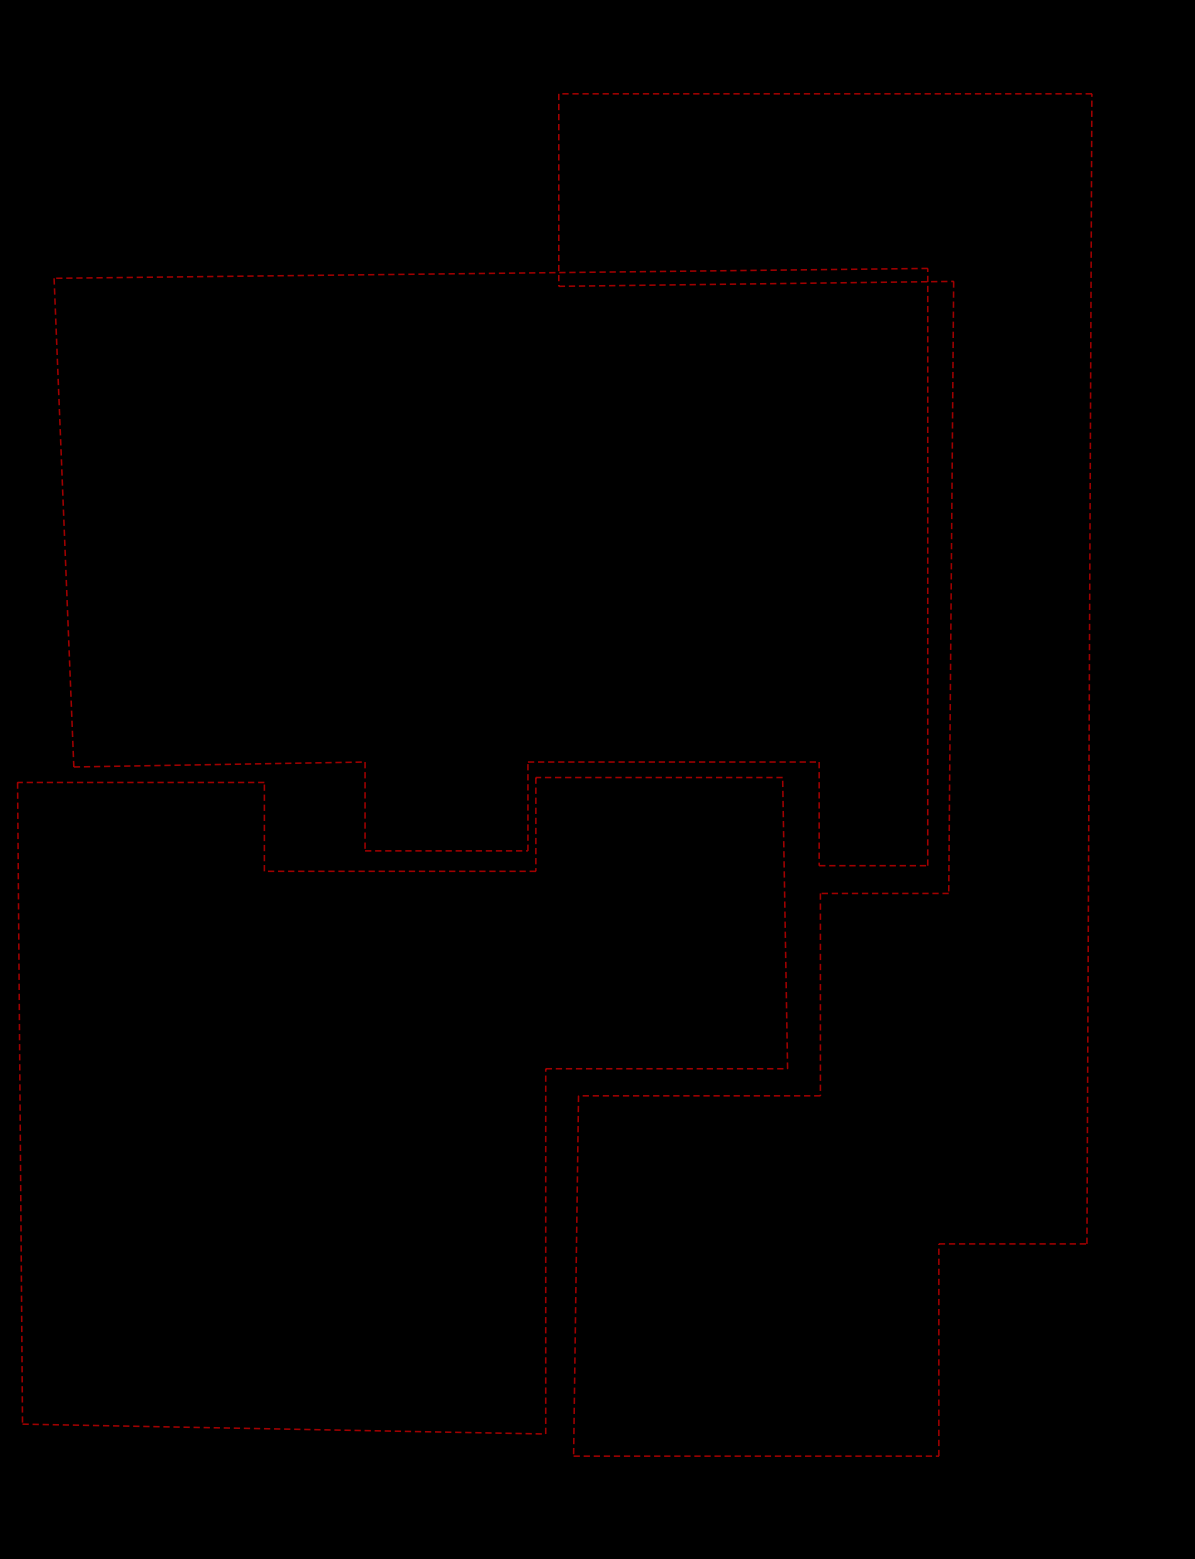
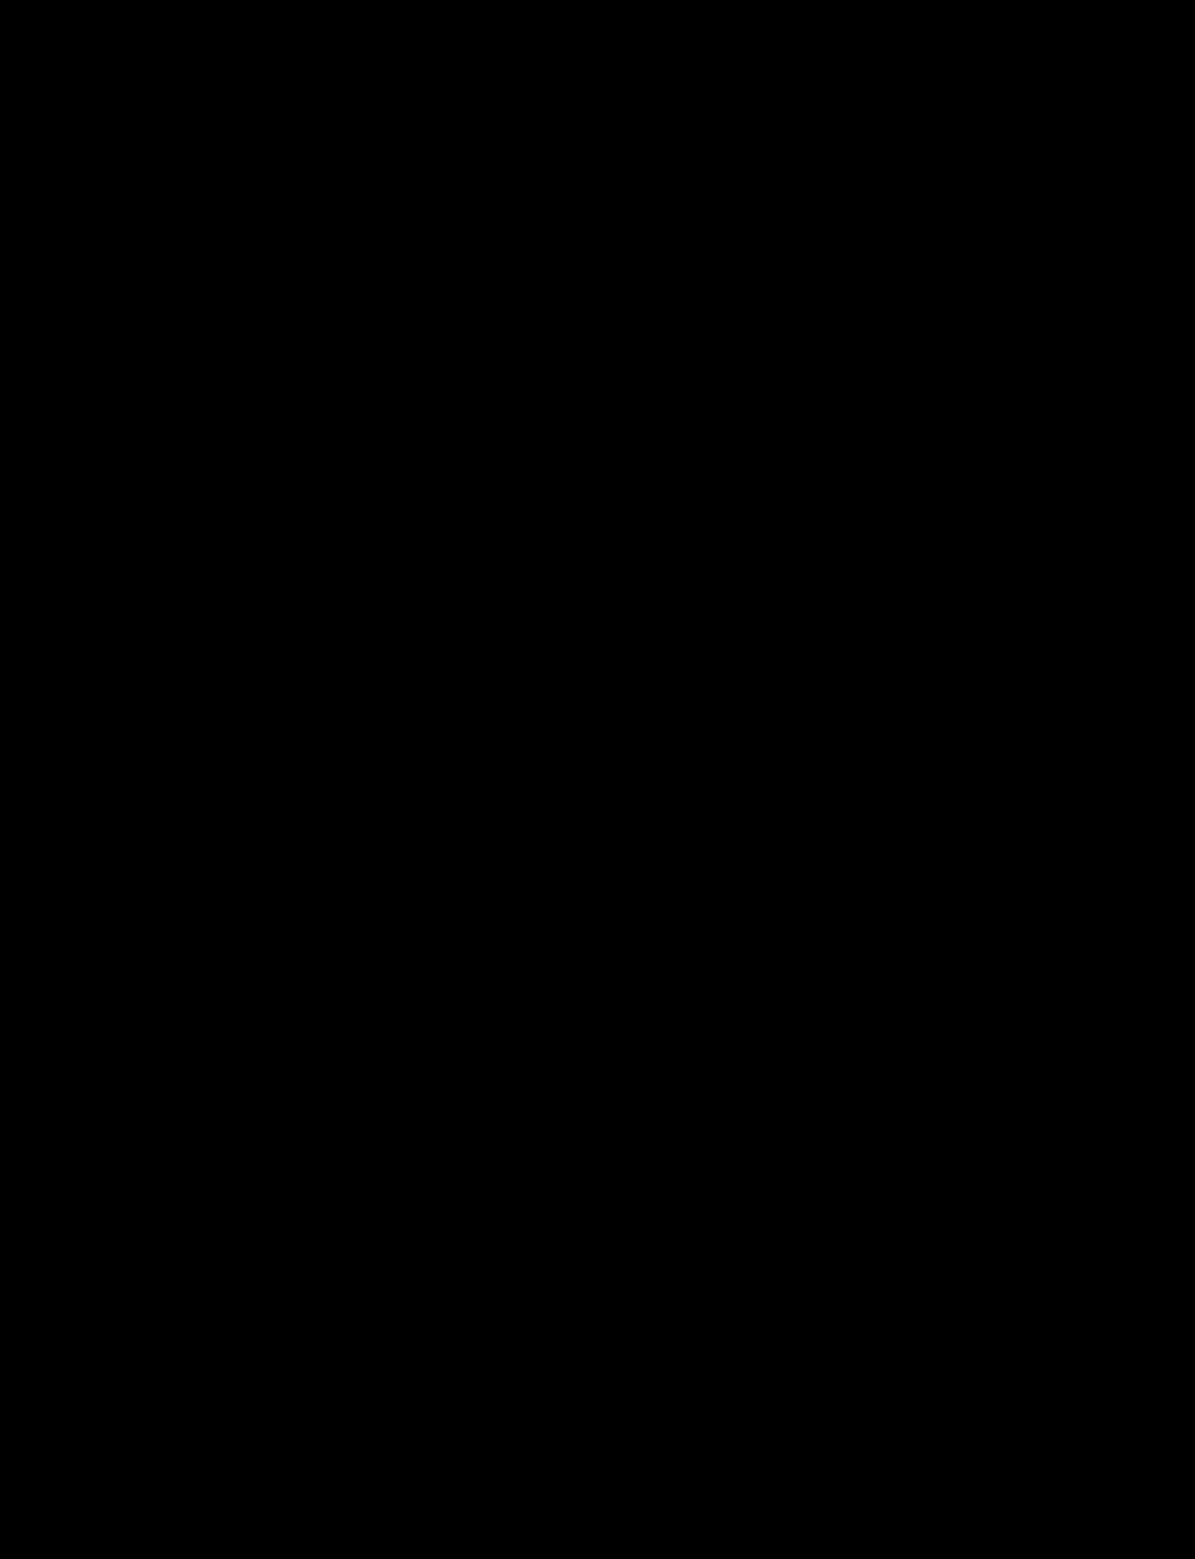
top zone outline: (1091, 93) (1086, 1243) (938, 1243) (938, 1456) (573, 1456) (578, 1095) (820, 1095) (820, 893) (948, 893) (953, 281) (558, 286) (558, 93) (1091, 93) -> none
top zone outline: (927, 268) (927, 865) (819, 865) (819, 762) (527, 762) (527, 850) (365, 850) (365, 762) (73, 766) (54, 278) (927, 268) -> none
top zone outline: (782, 777) (787, 1068) (545, 1068) (545, 1434) (22, 1424) (17, 782) (264, 782) (264, 871) (535, 871) (535, 777) (782, 777) -> none

